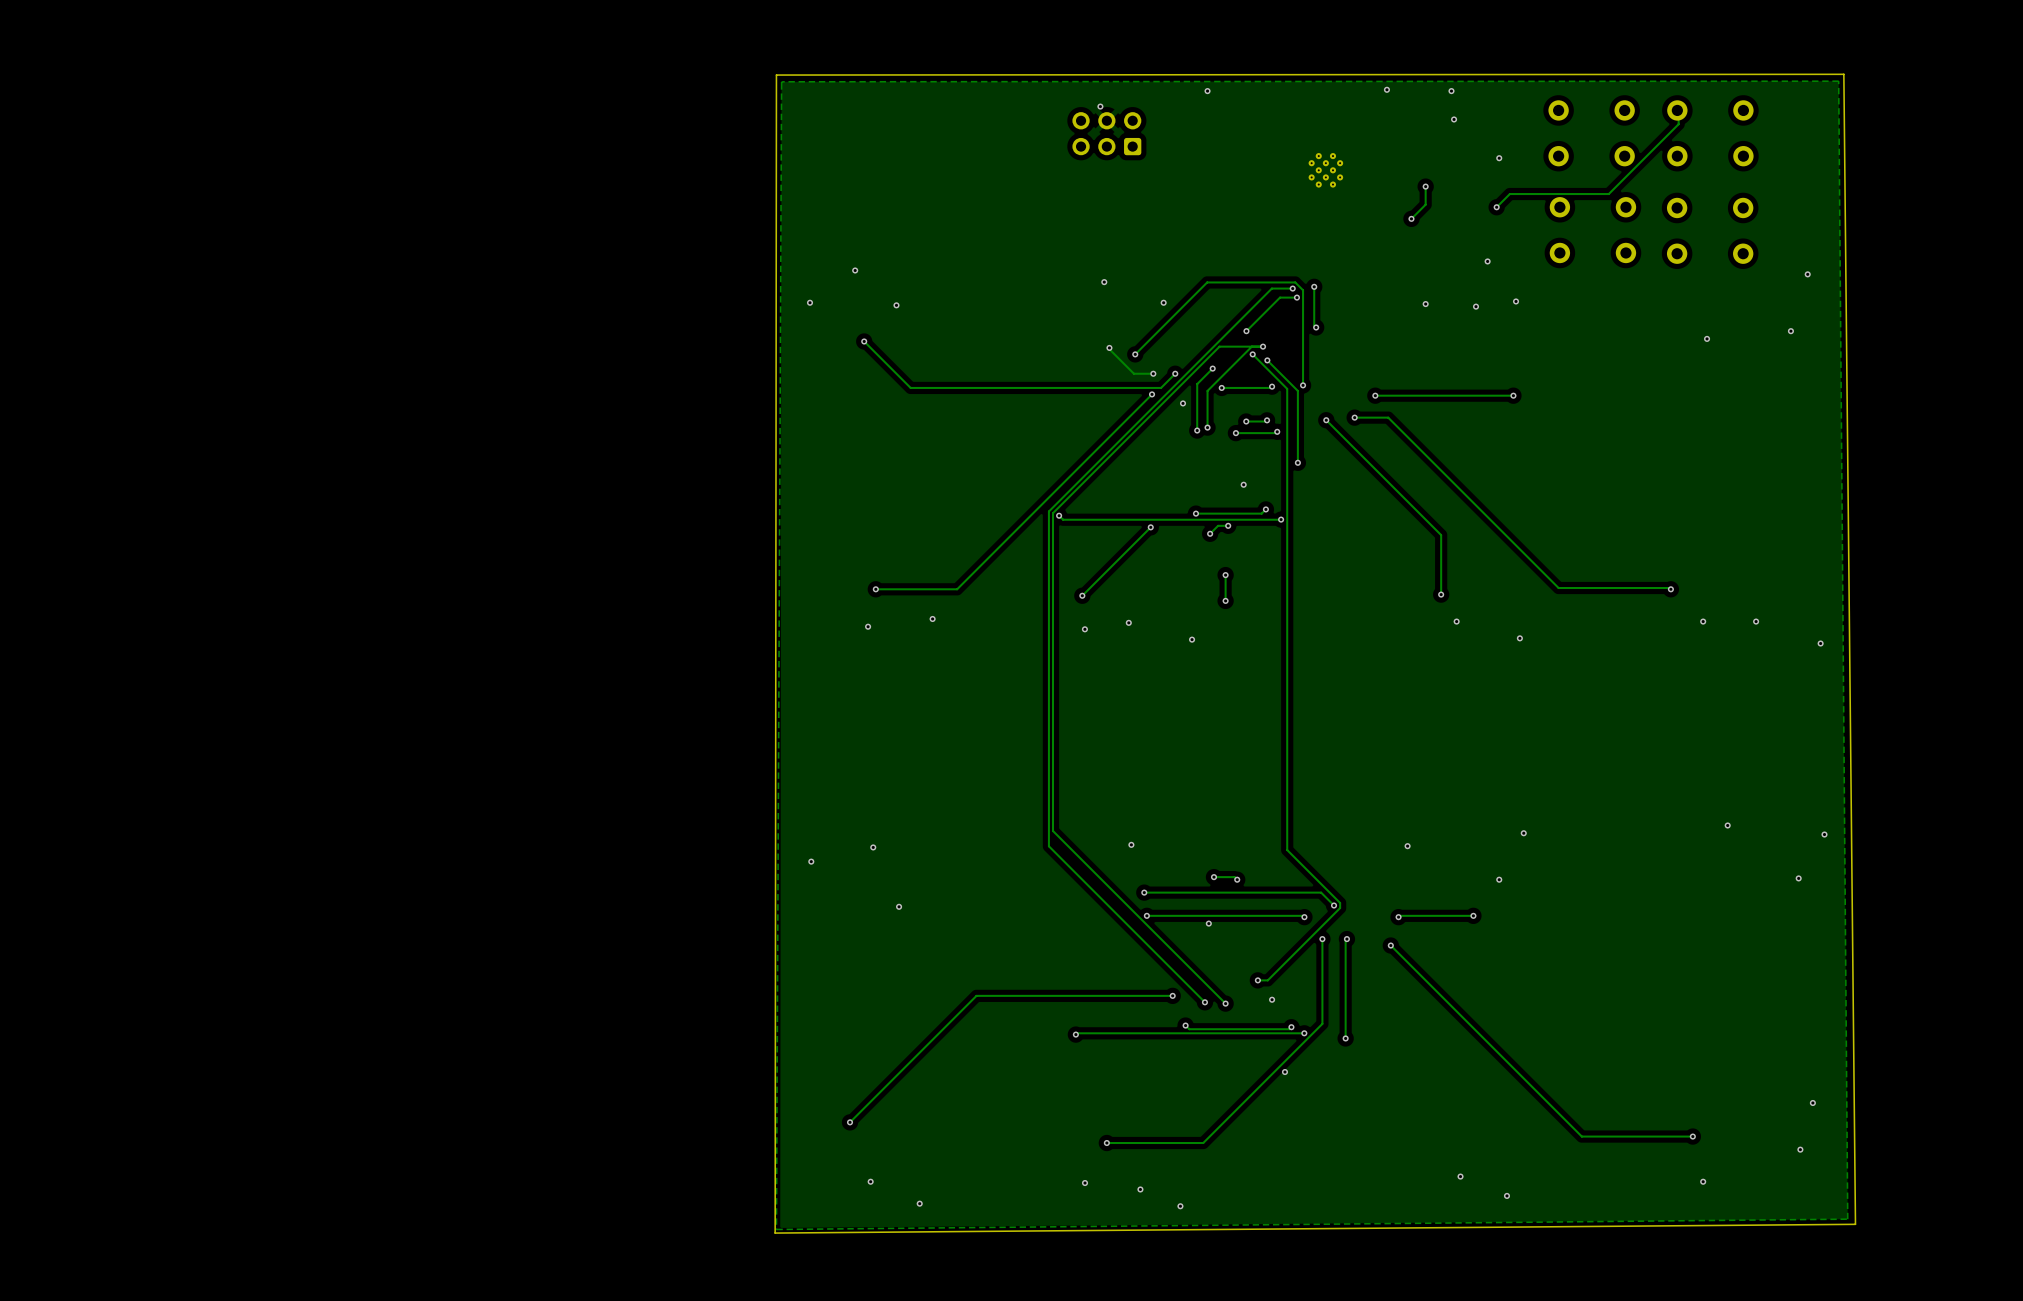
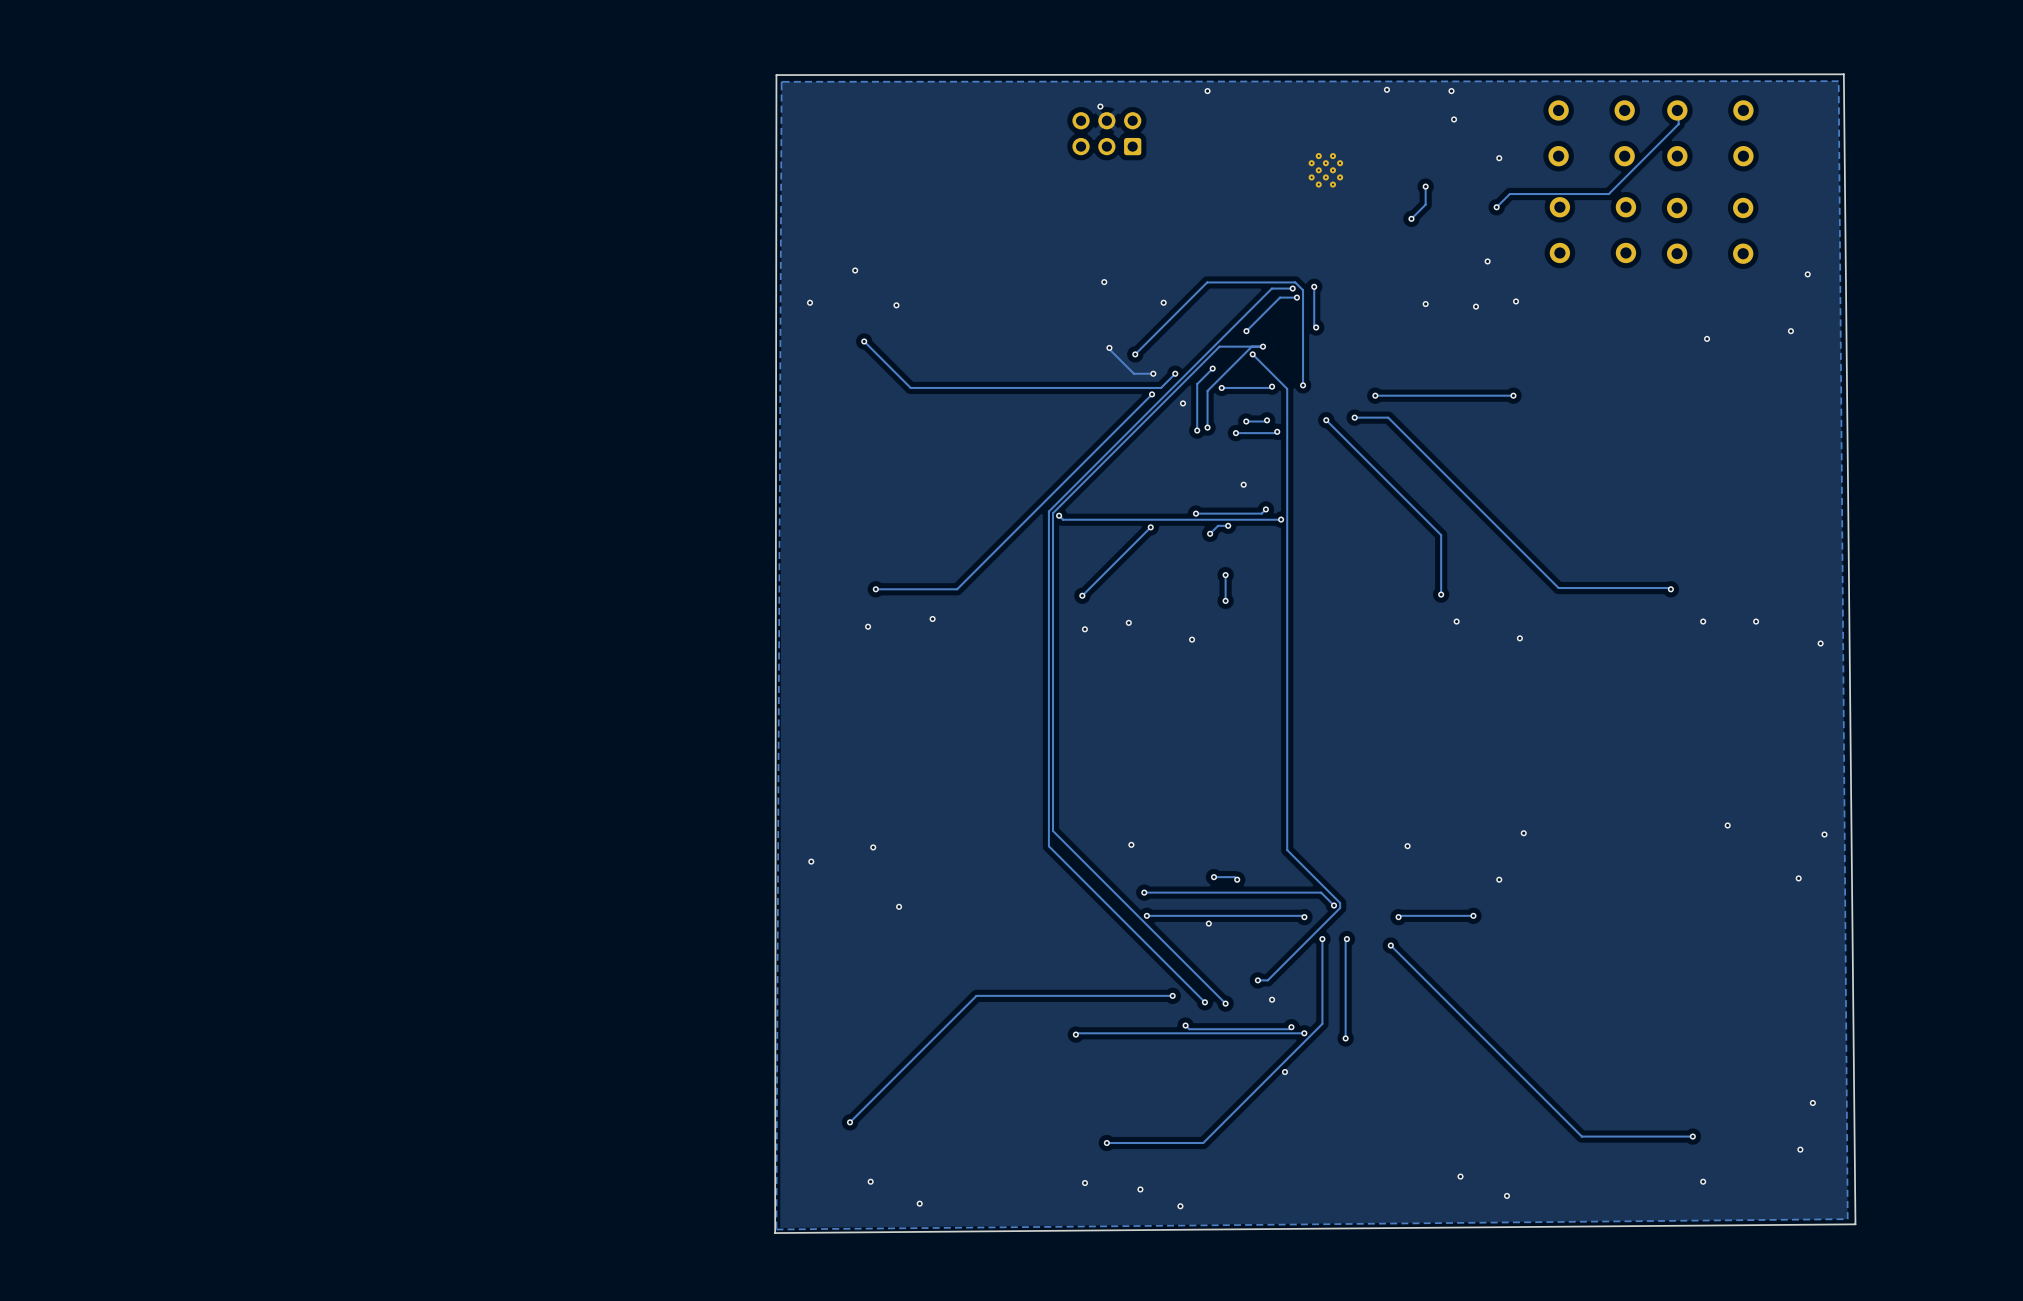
track: (1267, 360) (1297, 390) (1297, 462) -> none
via: (1267, 360) -> none
via: (1297, 462) -> none

